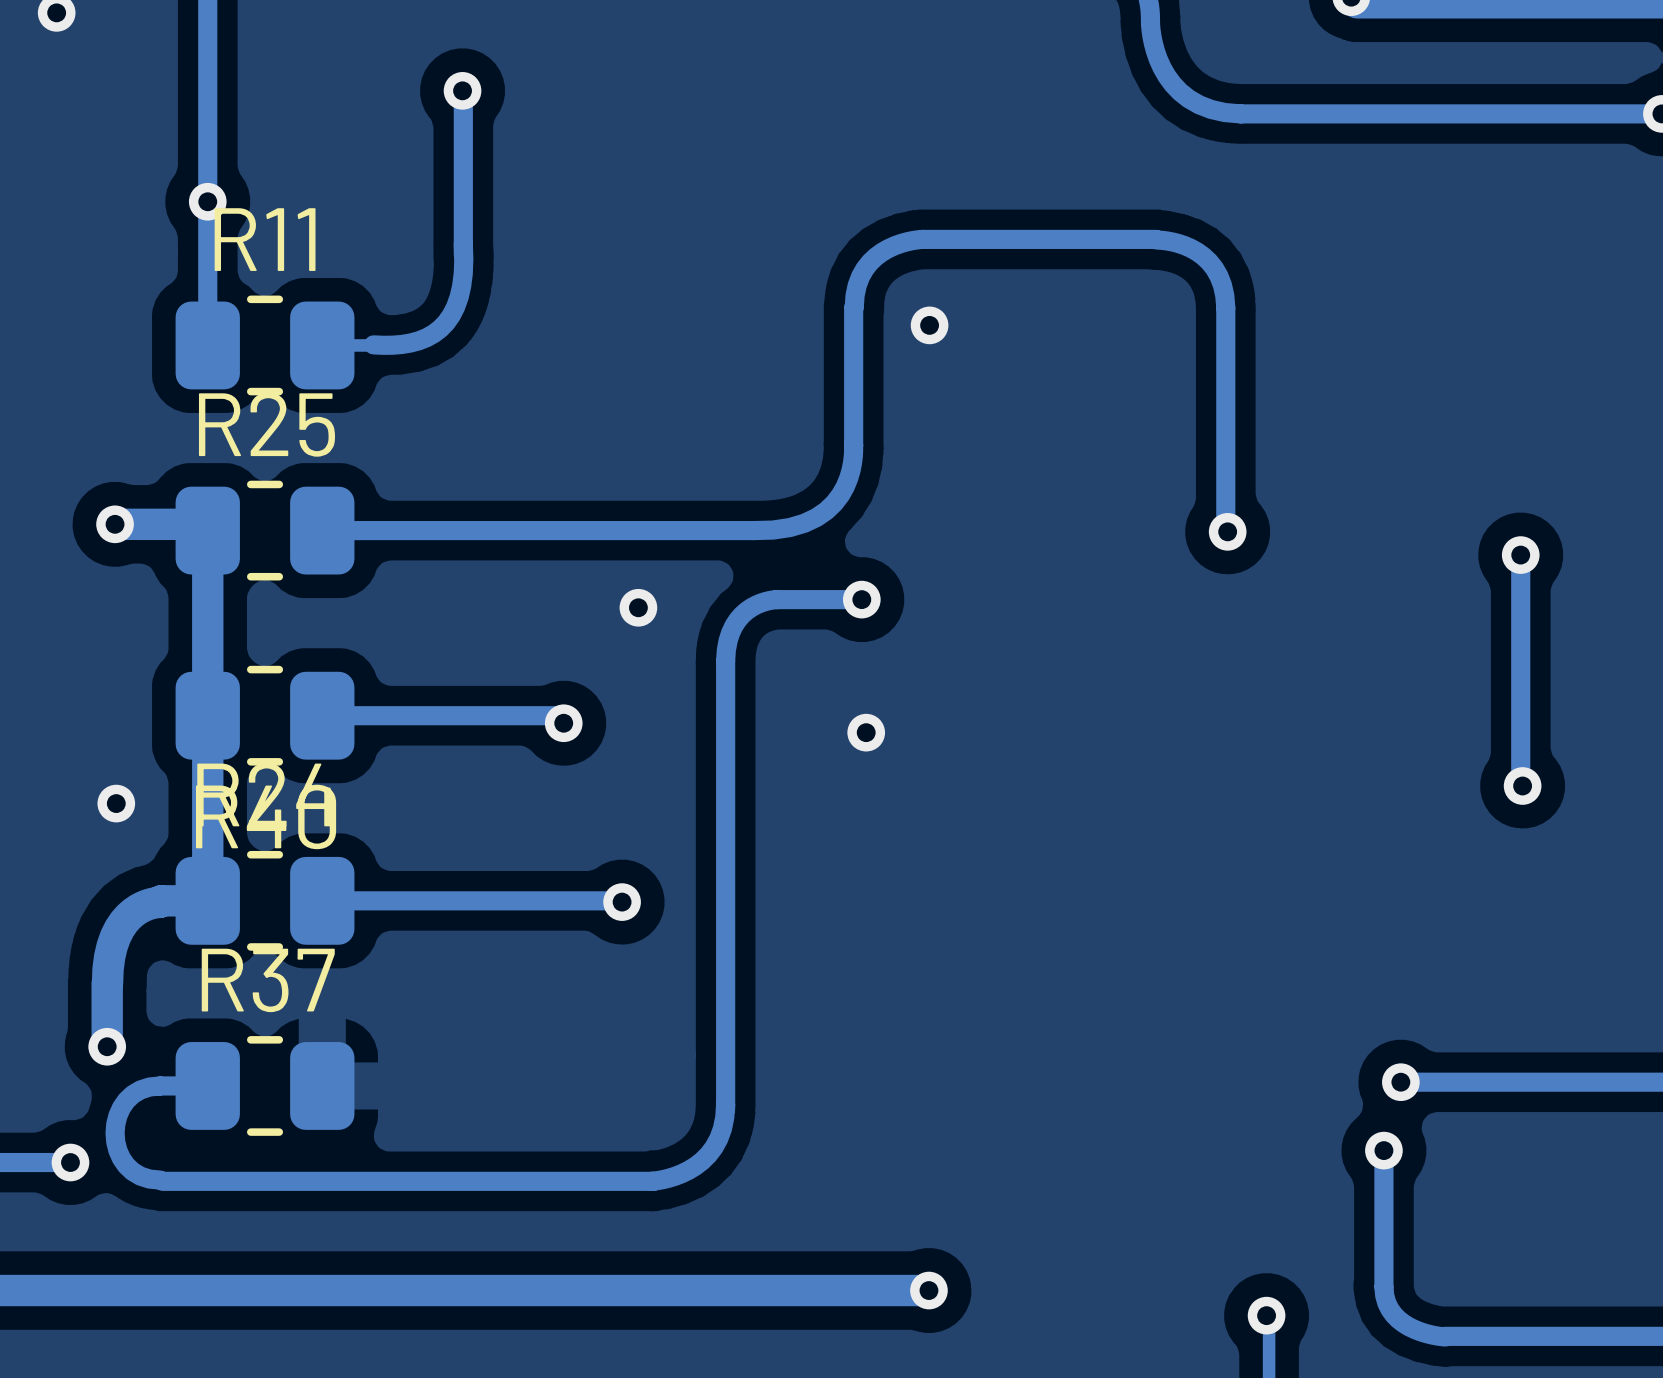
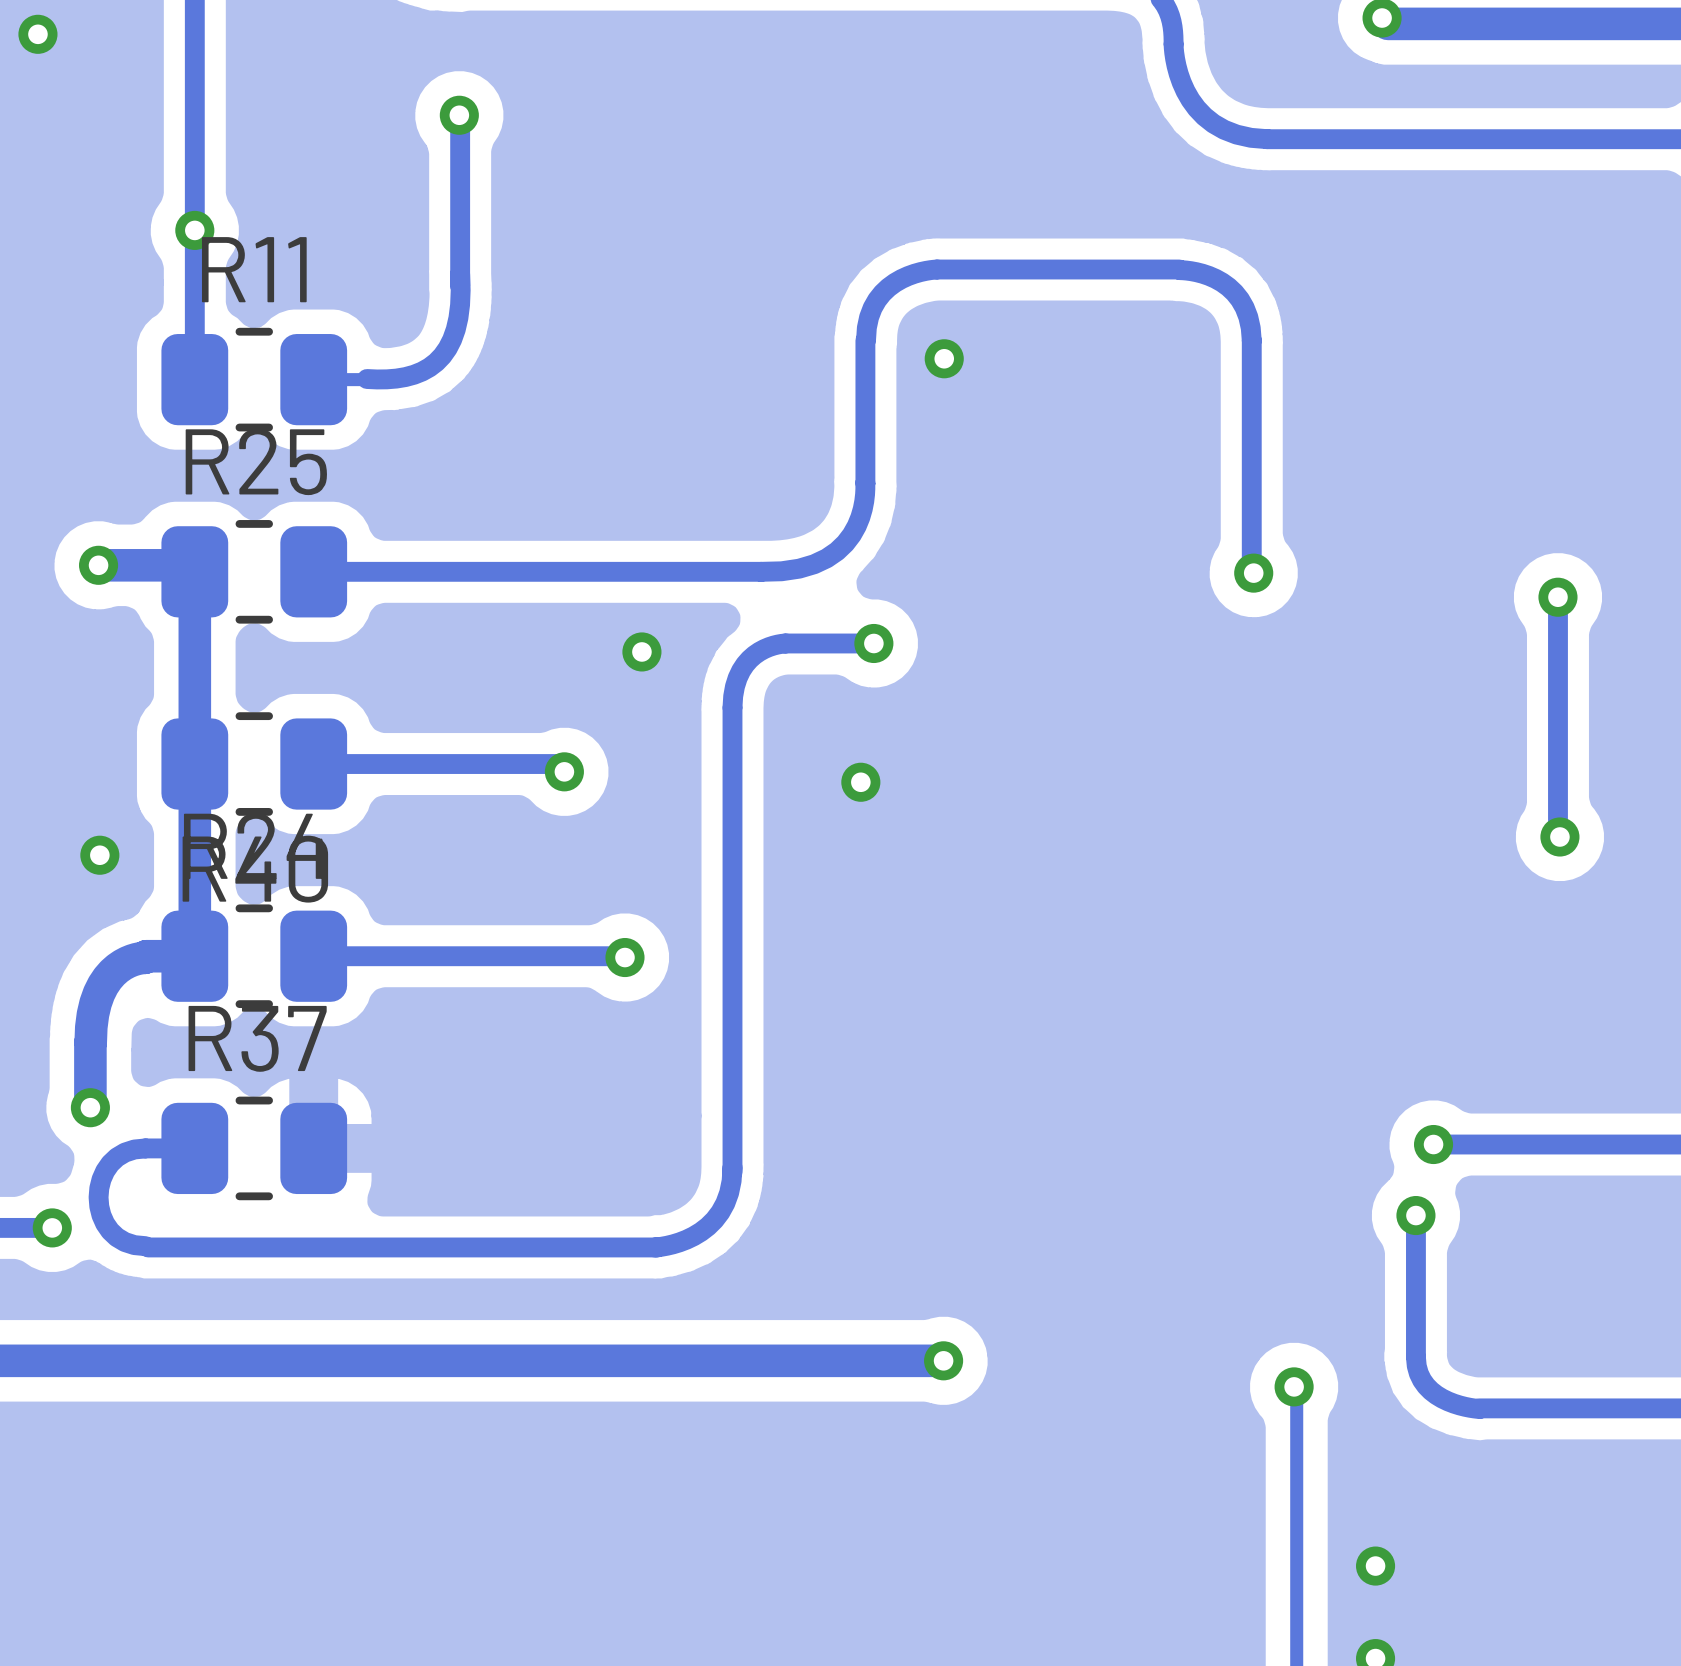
via position: (866, 732) -> (860, 782)

